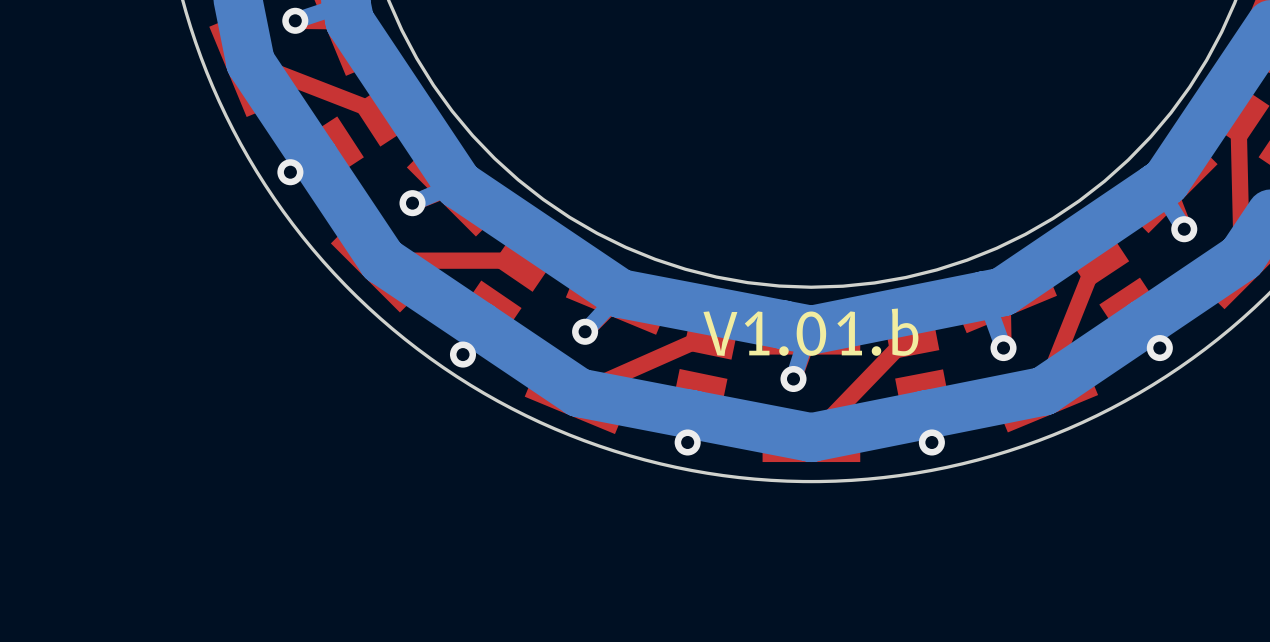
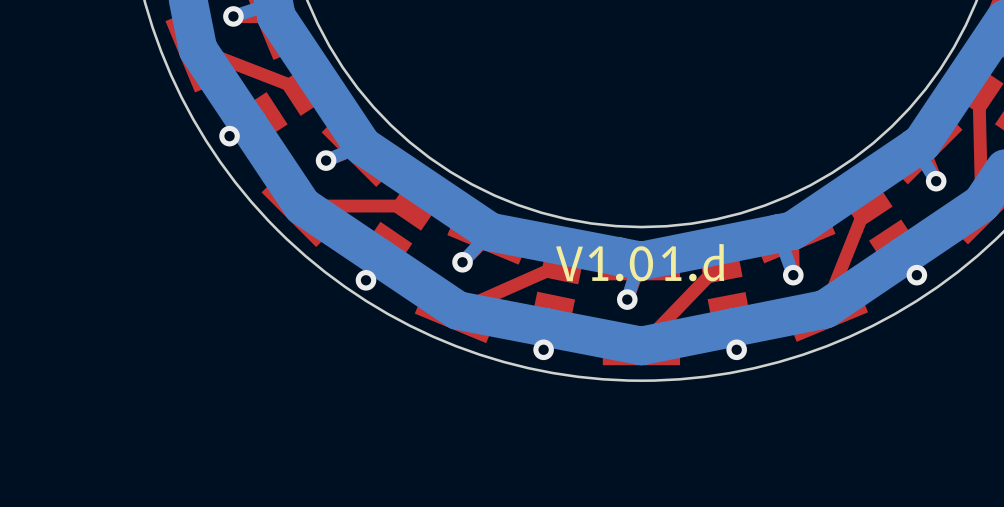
text: V1.01.b (810, 332) -> V1.01.d (640, 262)

